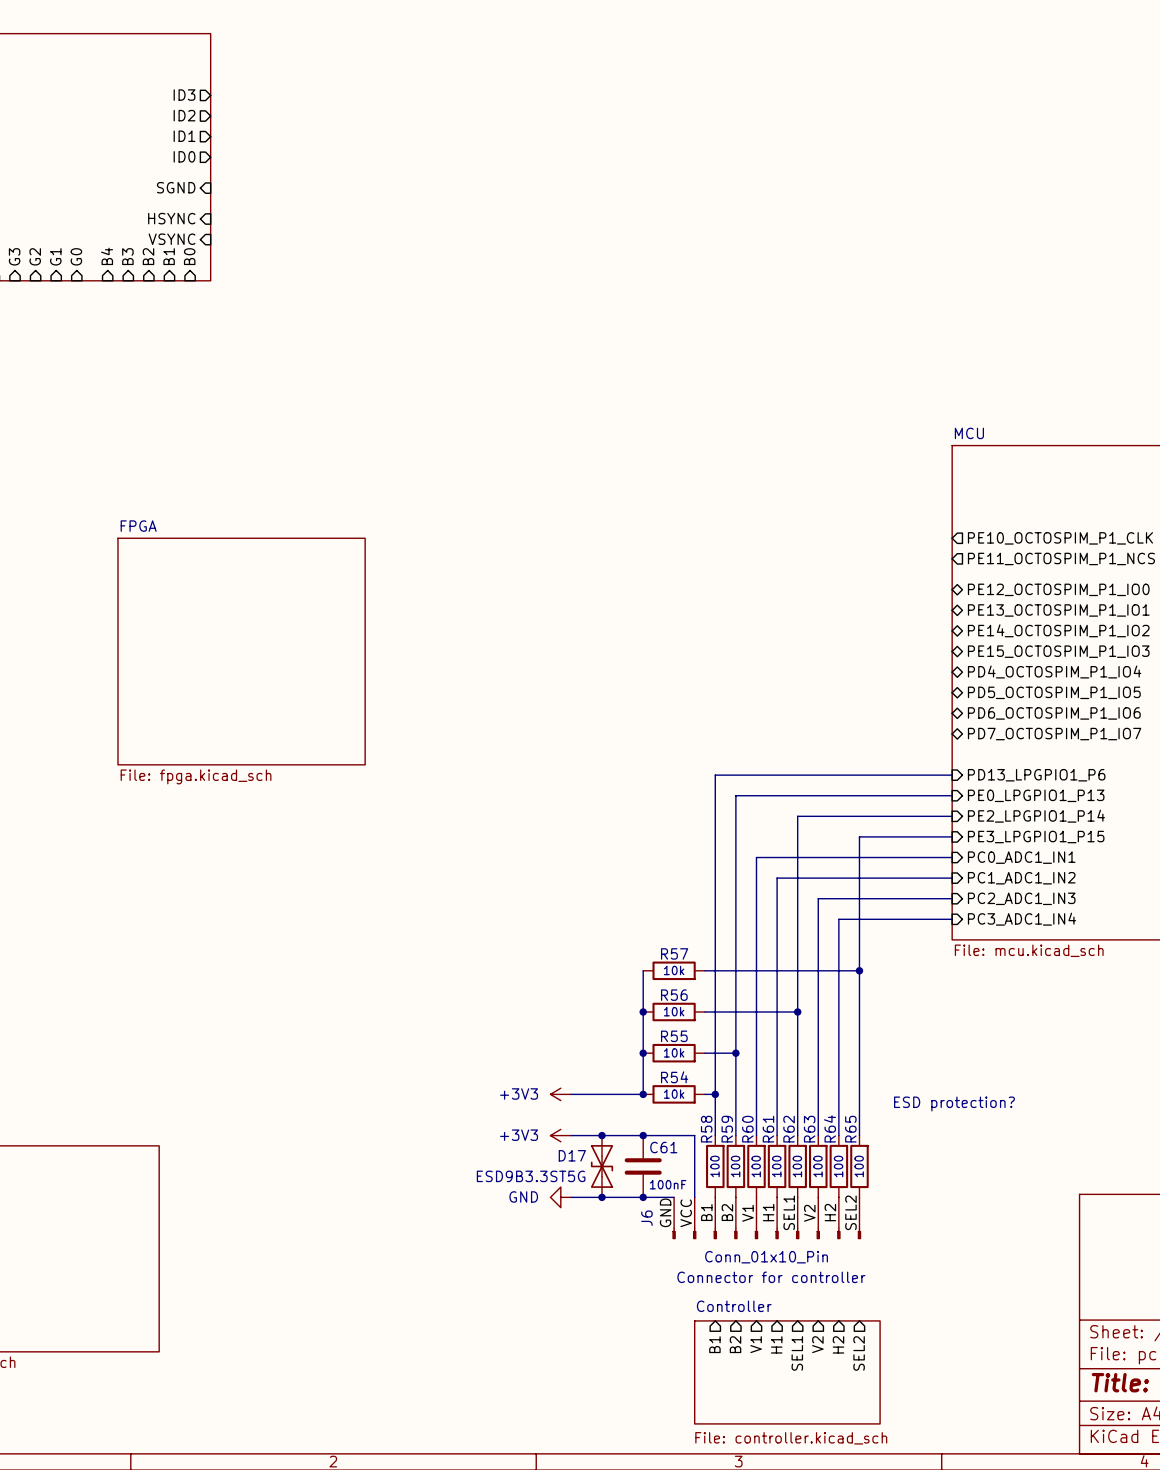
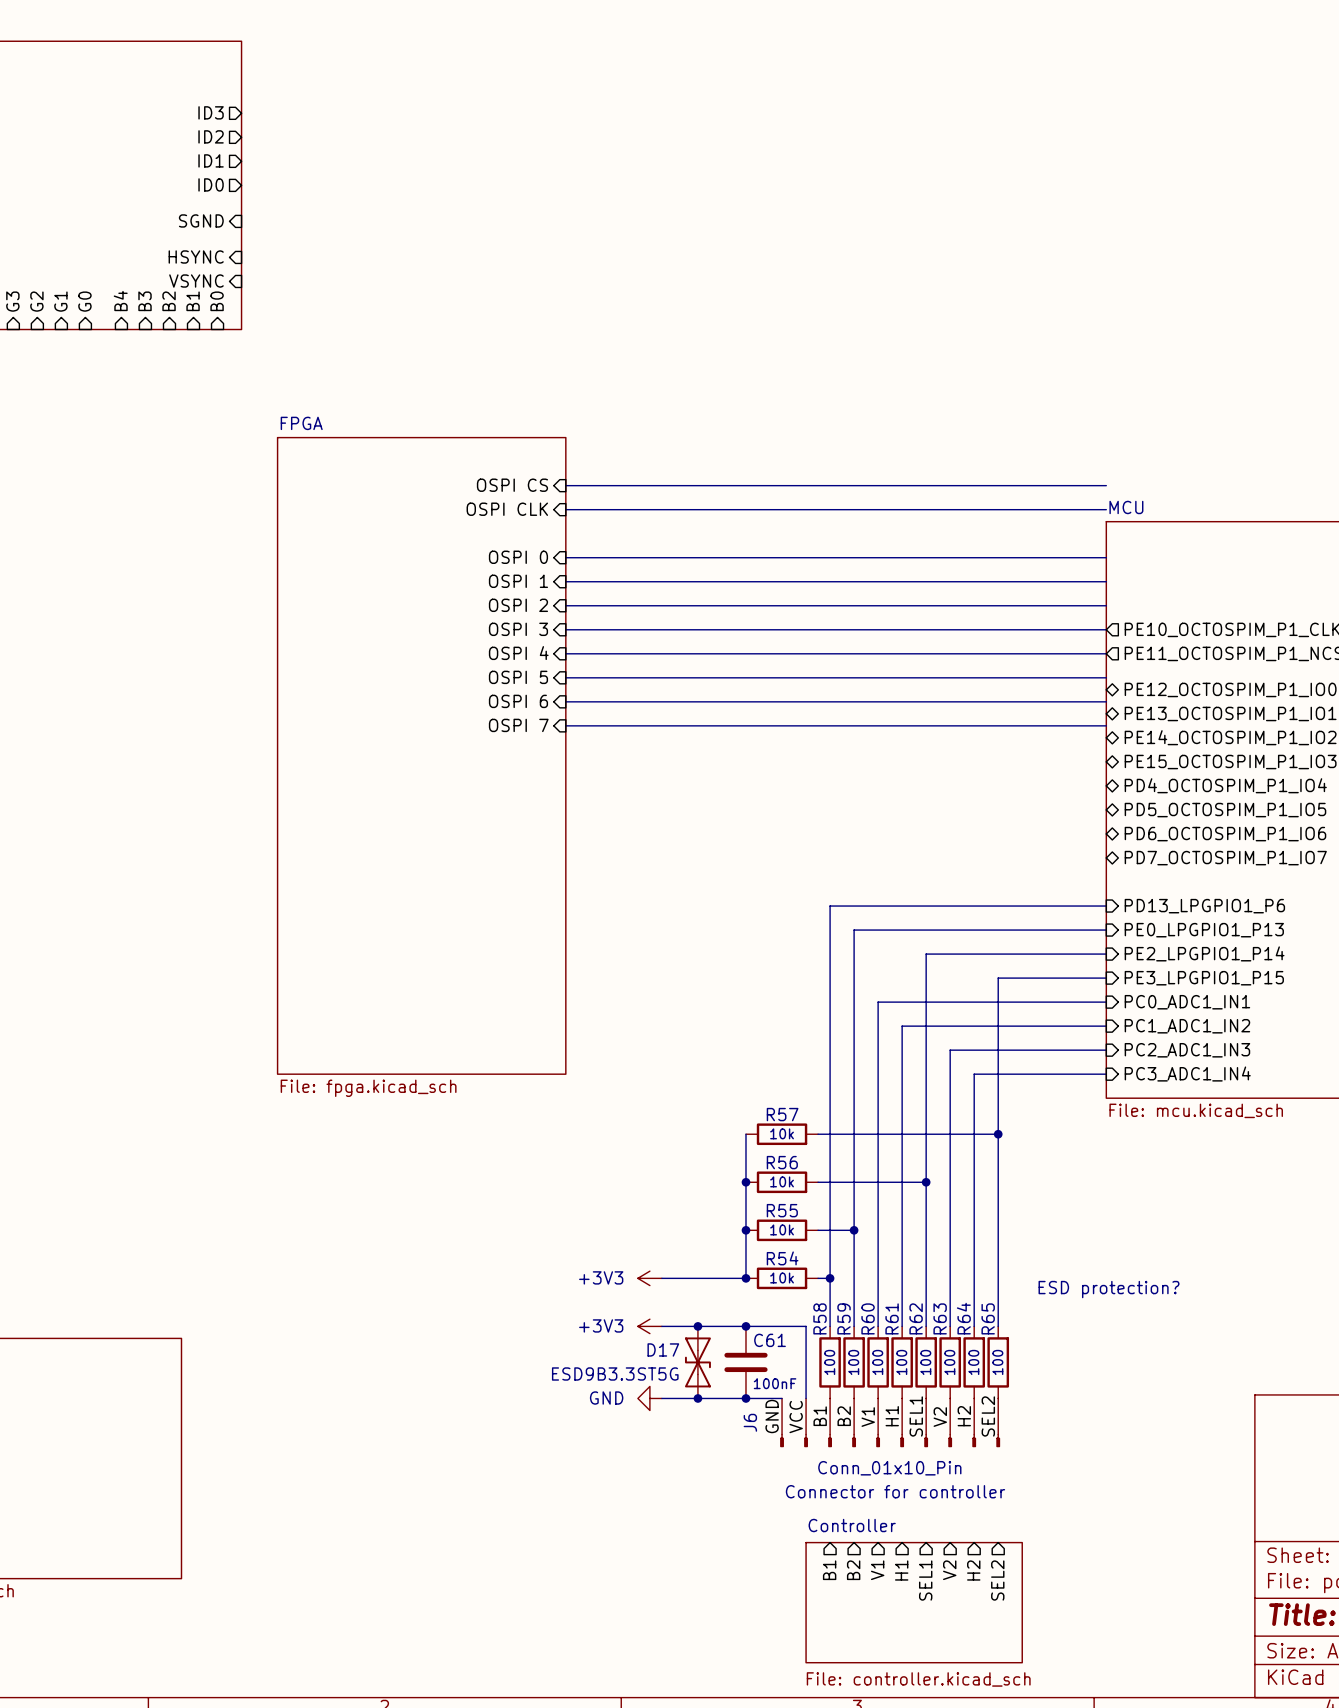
sheet pin: none -> OSPI CS (512, 485)
wire: none -> (565, 485) (1106, 485)
sheet pin: none -> OSPI CLK (507, 509)
wire: none -> (565, 509) (1106, 509)
sheet pin: none -> OSPI 0 (518, 557)
wire: none -> (565, 557) (1106, 557)
sheet pin: none -> OSPI 1 (518, 581)
wire: none -> (565, 581) (1106, 581)
sheet pin: none -> OSPI 2 (518, 605)
wire: none -> (565, 605) (1106, 605)
sheet pin: none -> OSPI 3 (518, 629)
wire: none -> (565, 629) (1106, 629)
sheet pin: none -> OSPI 4 (518, 653)
wire: none -> (565, 653) (1106, 653)
sheet pin: none -> OSPI 5 (518, 677)
wire: none -> (565, 677) (1106, 677)
sheet pin: none -> OSPI 6 (518, 701)
wire: none -> (565, 701) (1106, 701)
sheet pin: none -> OSPI 7 (518, 725)
wire: none -> (565, 725) (1106, 725)
sheet FPGA: none -> File: fpga.kicad_sch (421, 755)
sheet FPGA: File: fpga.kicad_sch (241, 651) -> none

